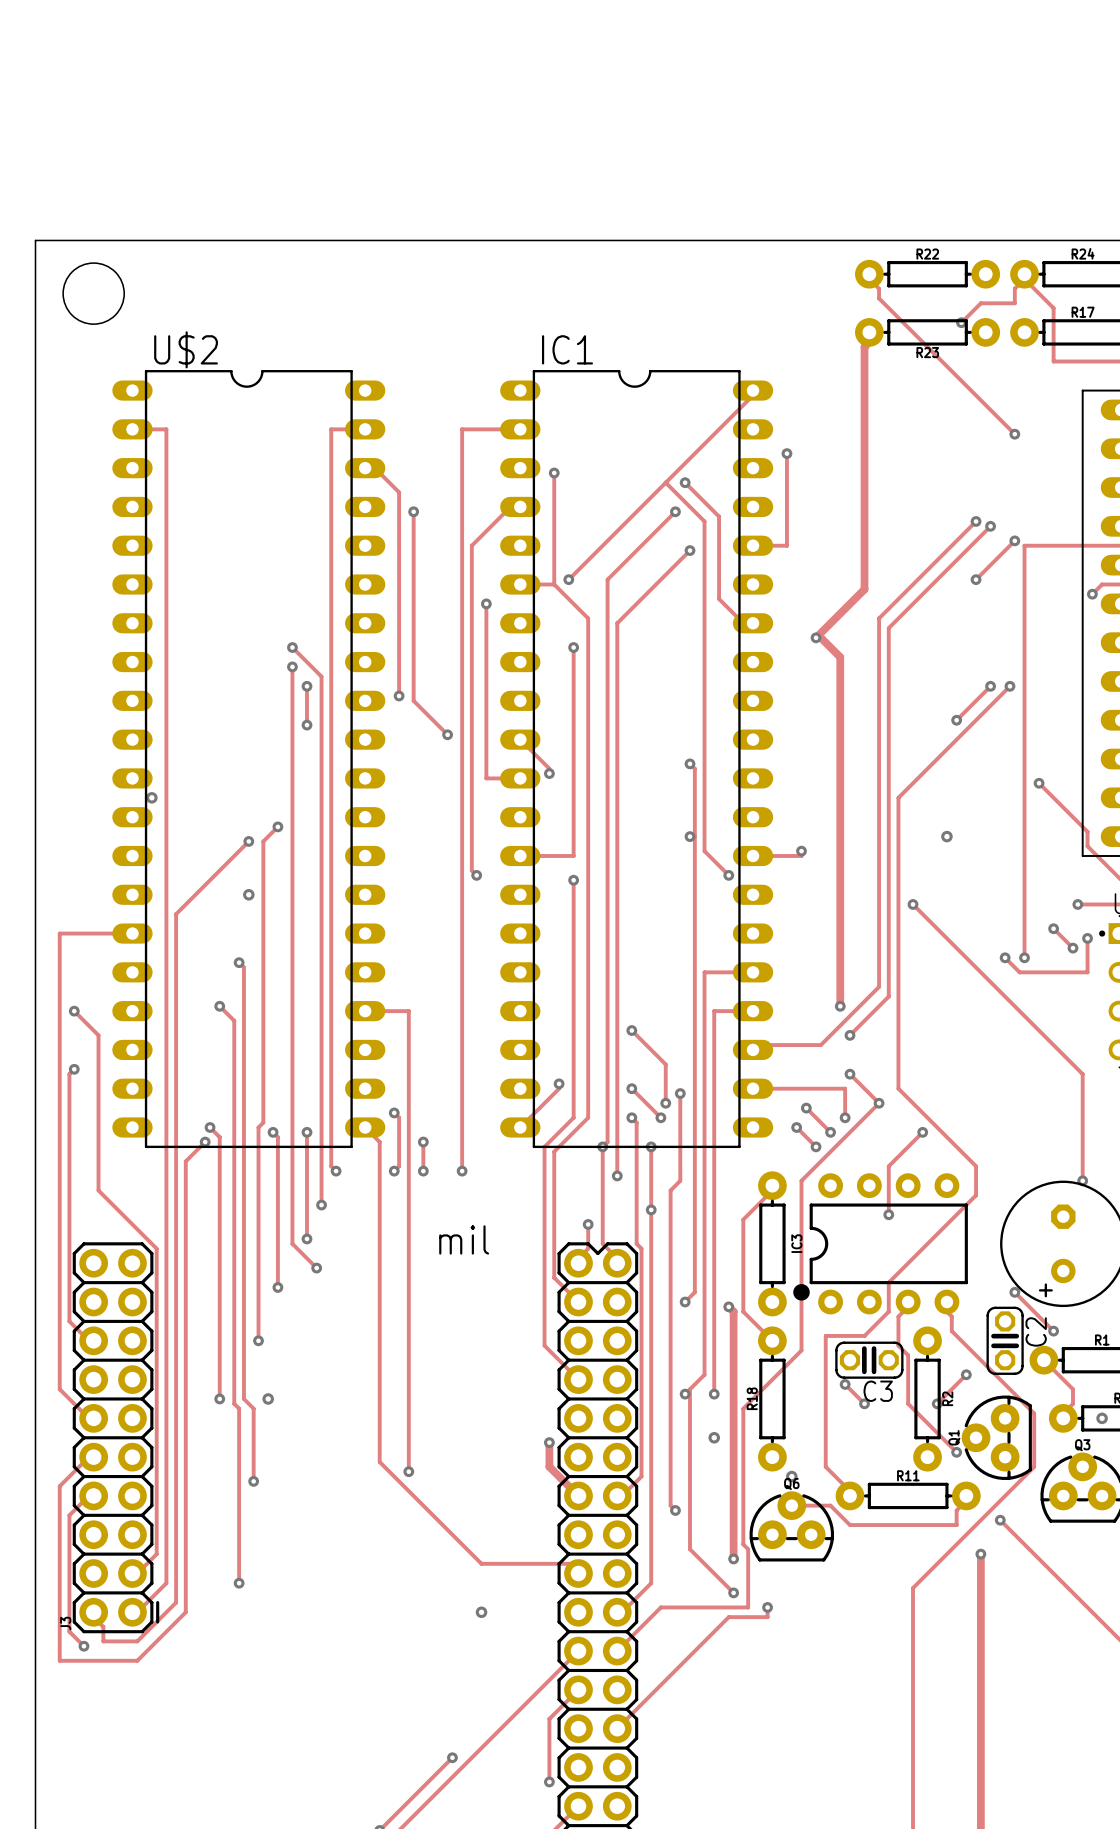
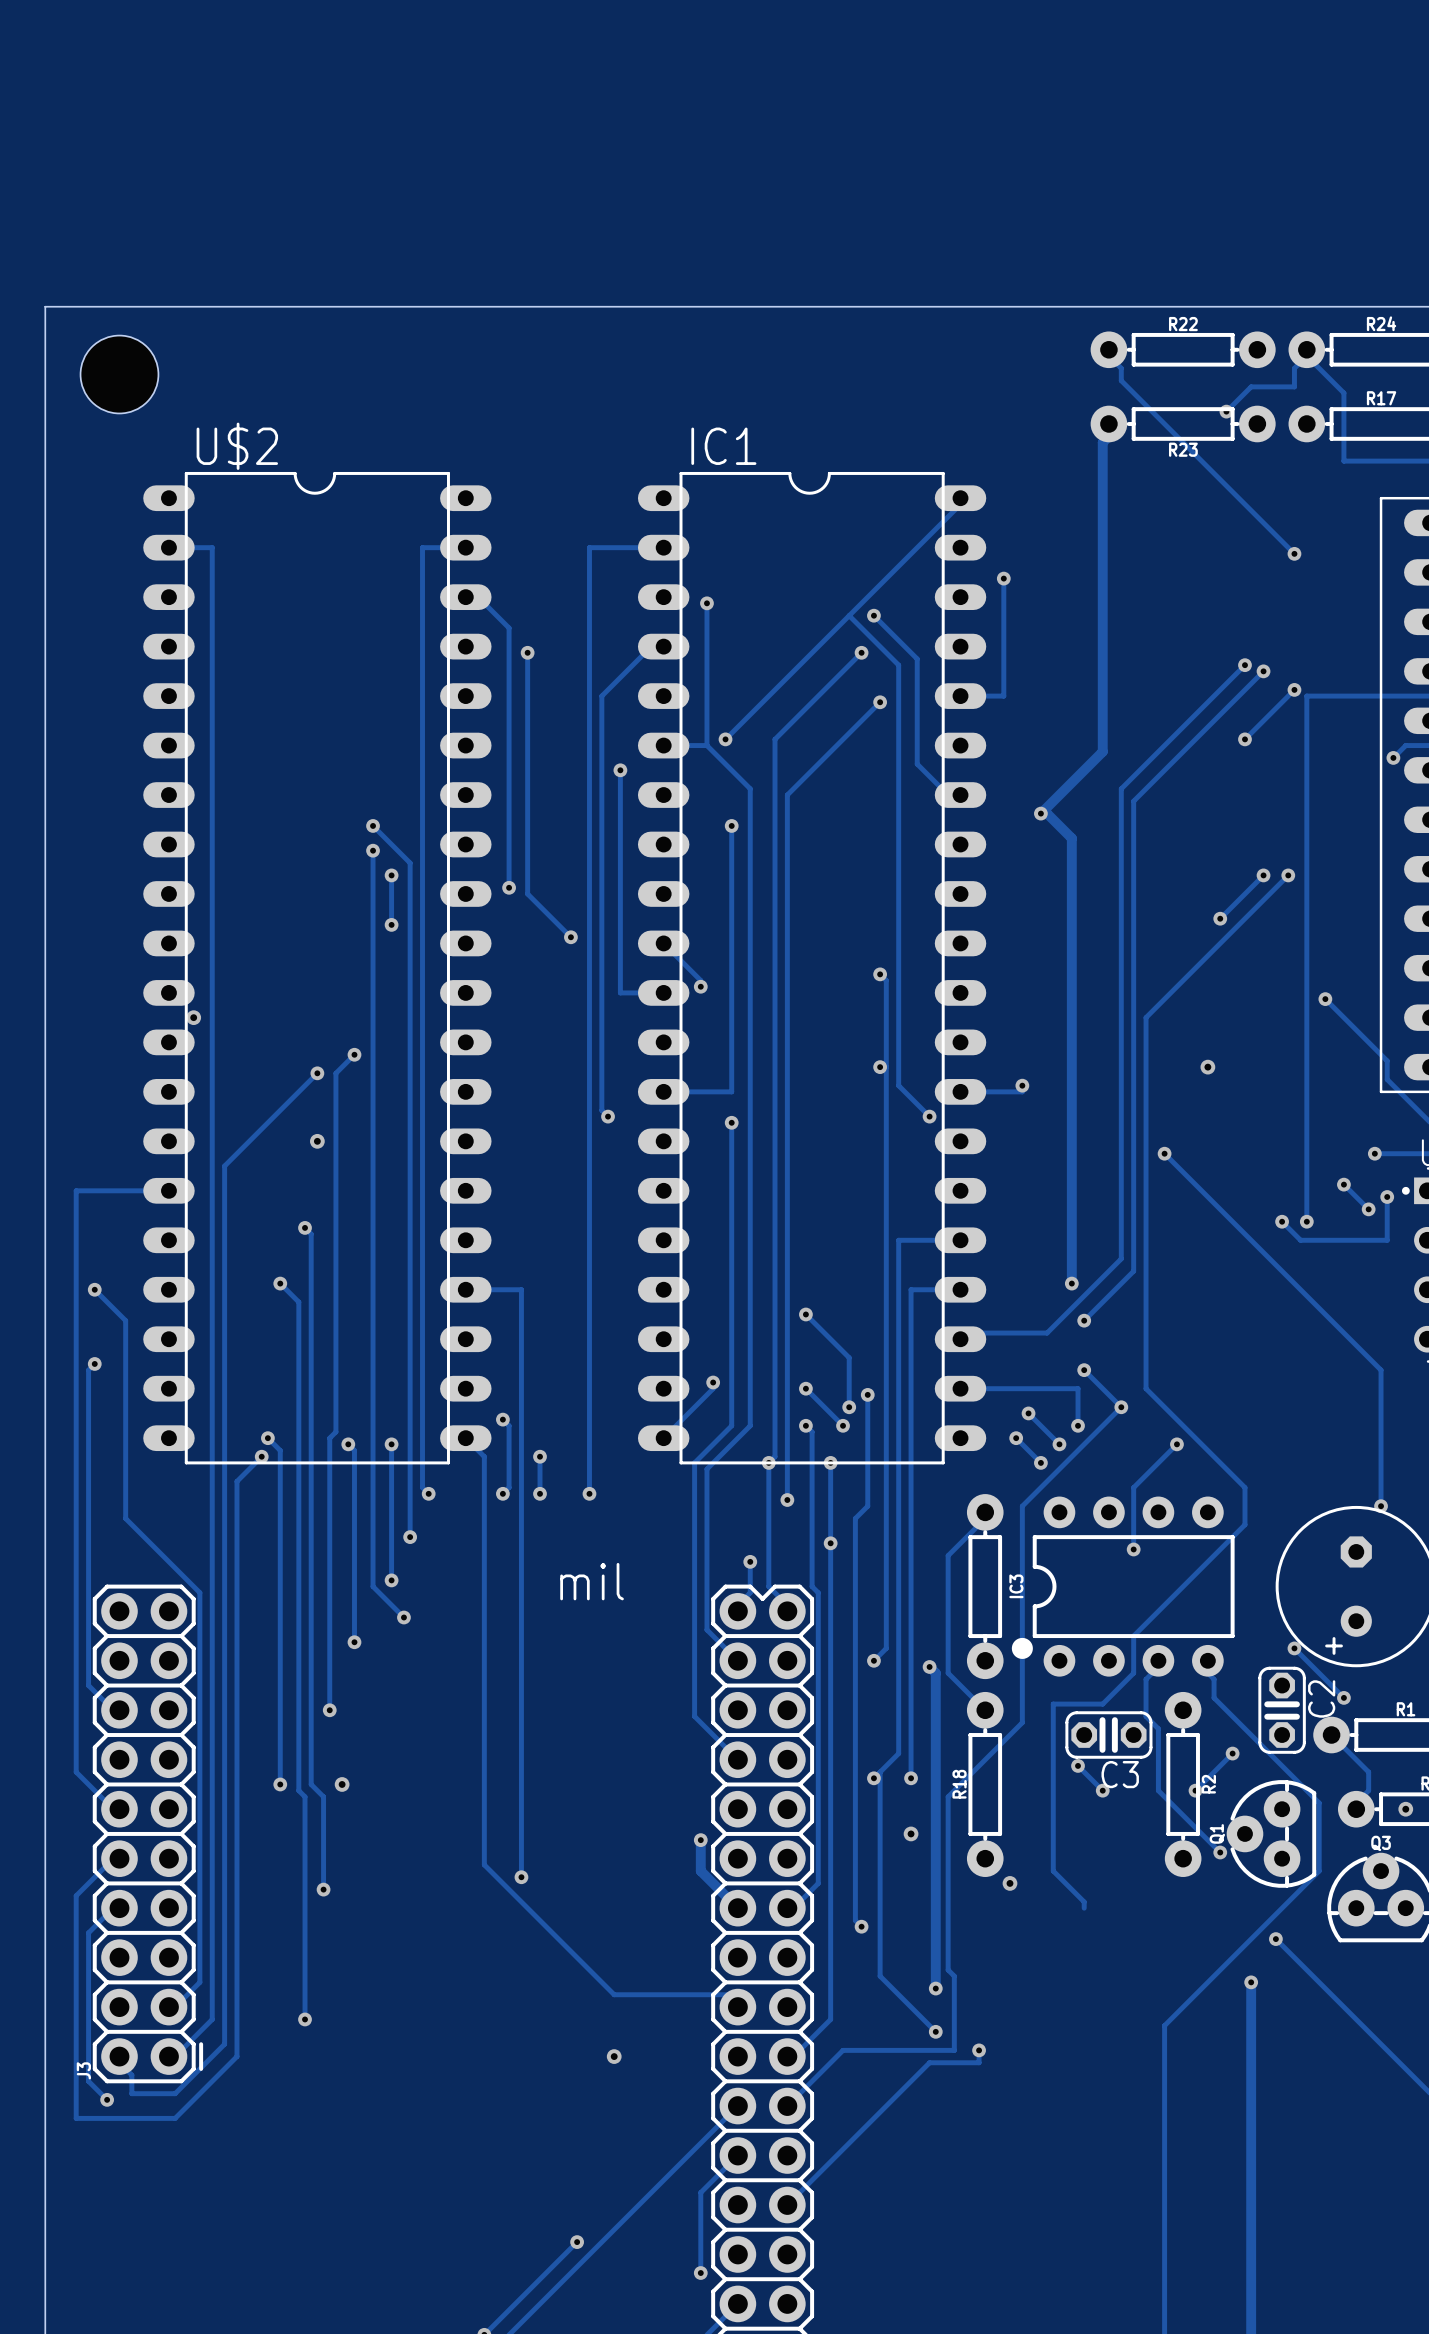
R11: (908, 1495) -> none
track: (966, 1495) (966, 1500) (956, 1510) (956, 1525) (849, 1525) (830, 1505) (791, 1505) -> none
Q6: (791, 1526) -> none

